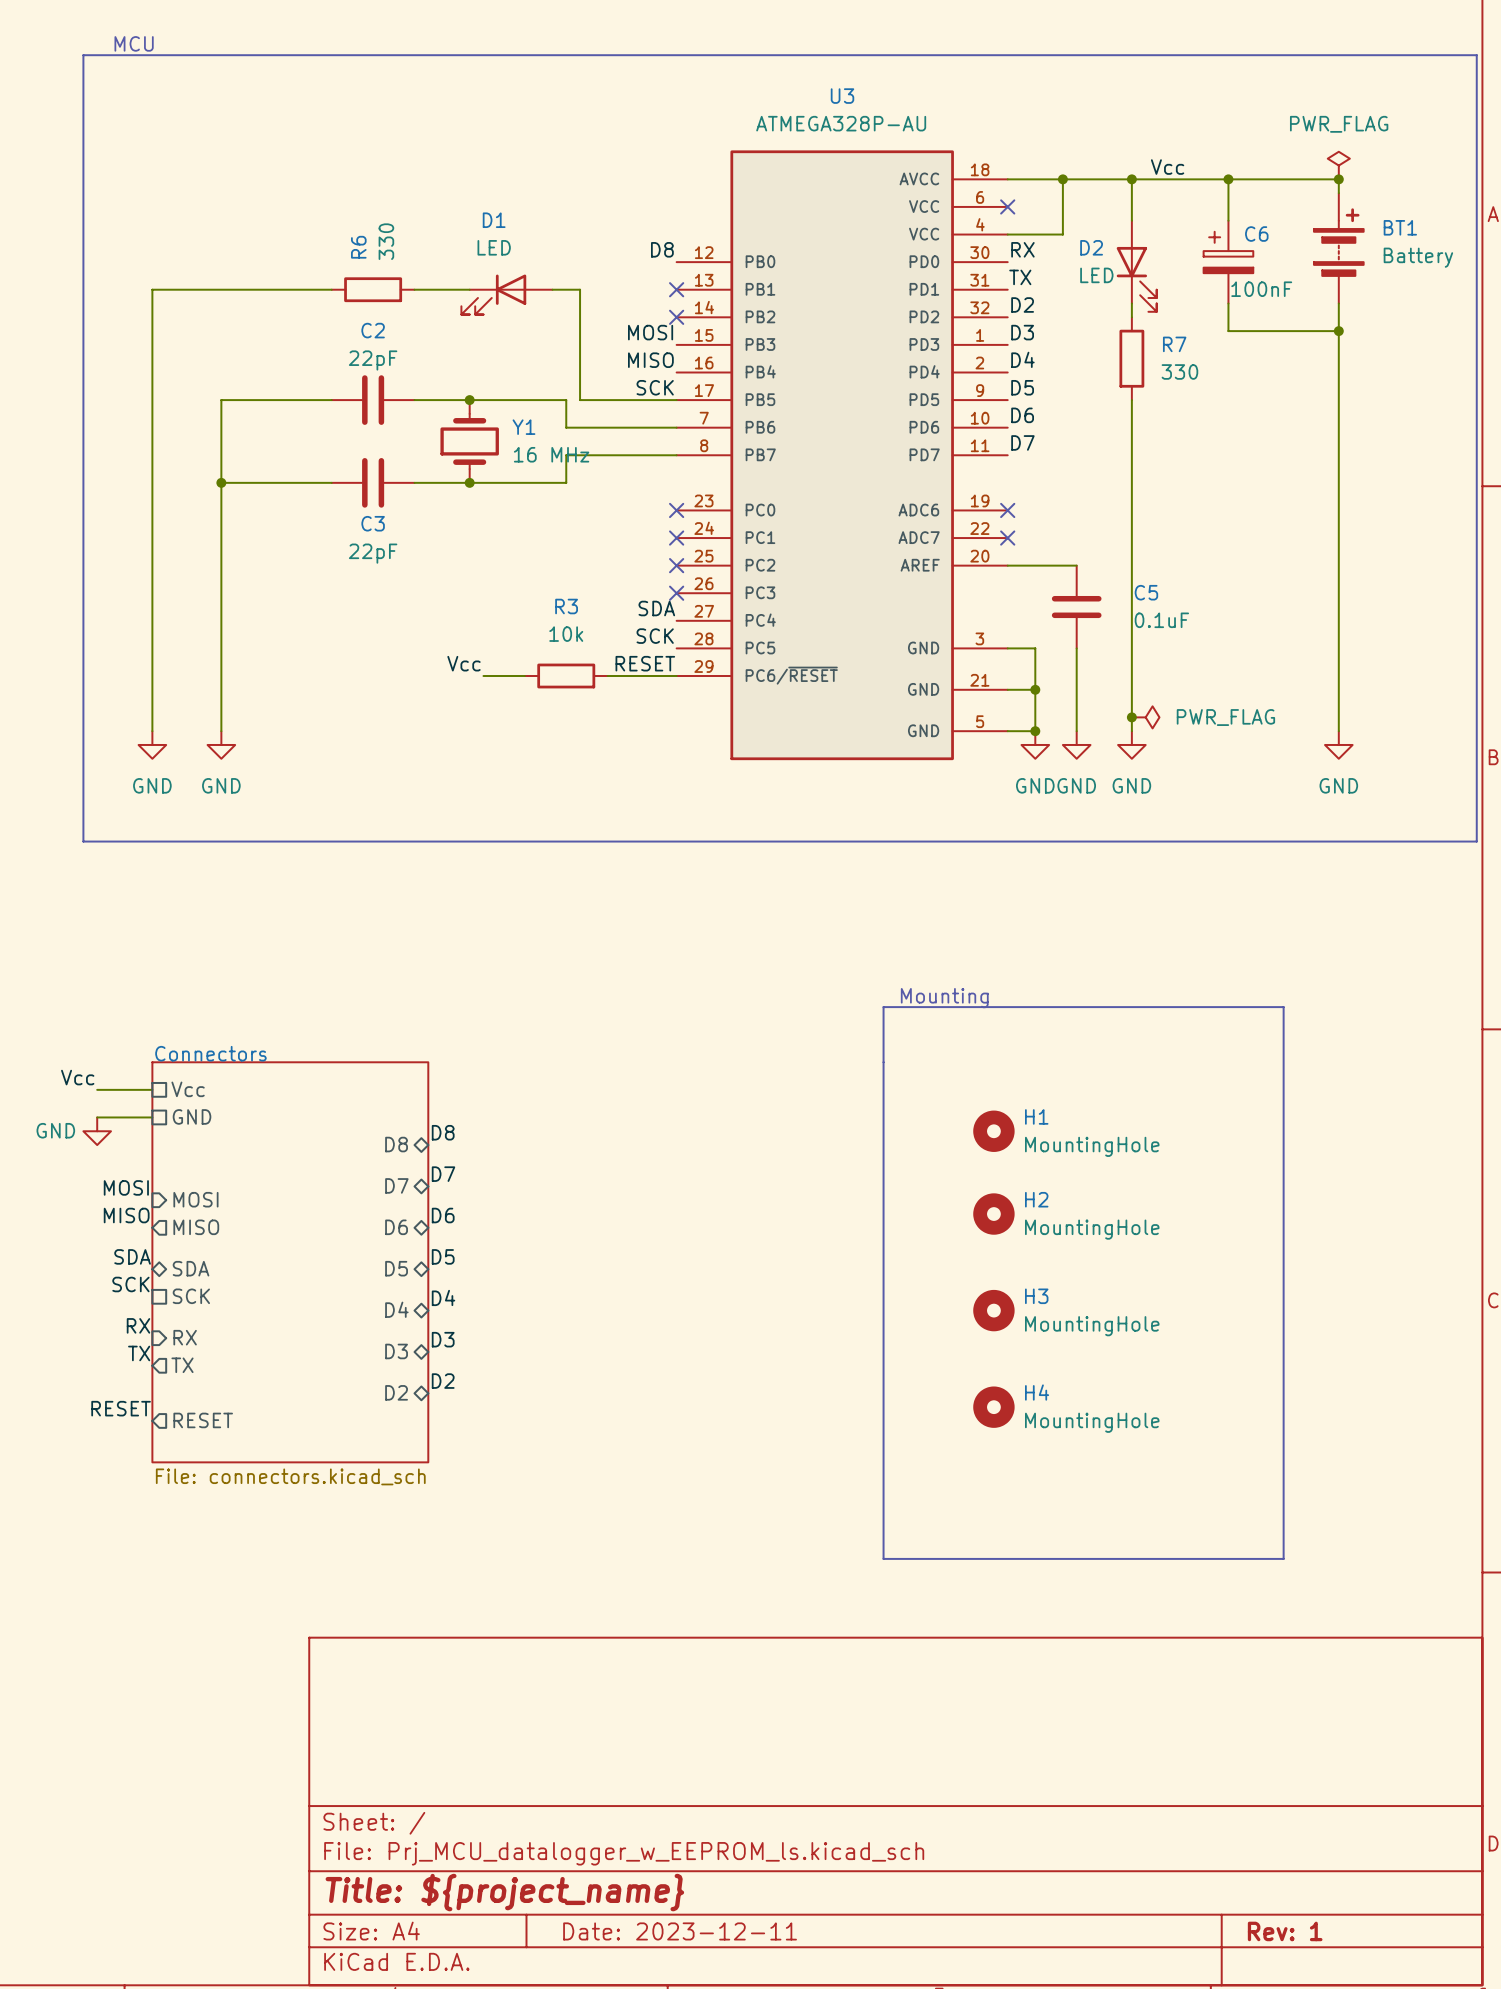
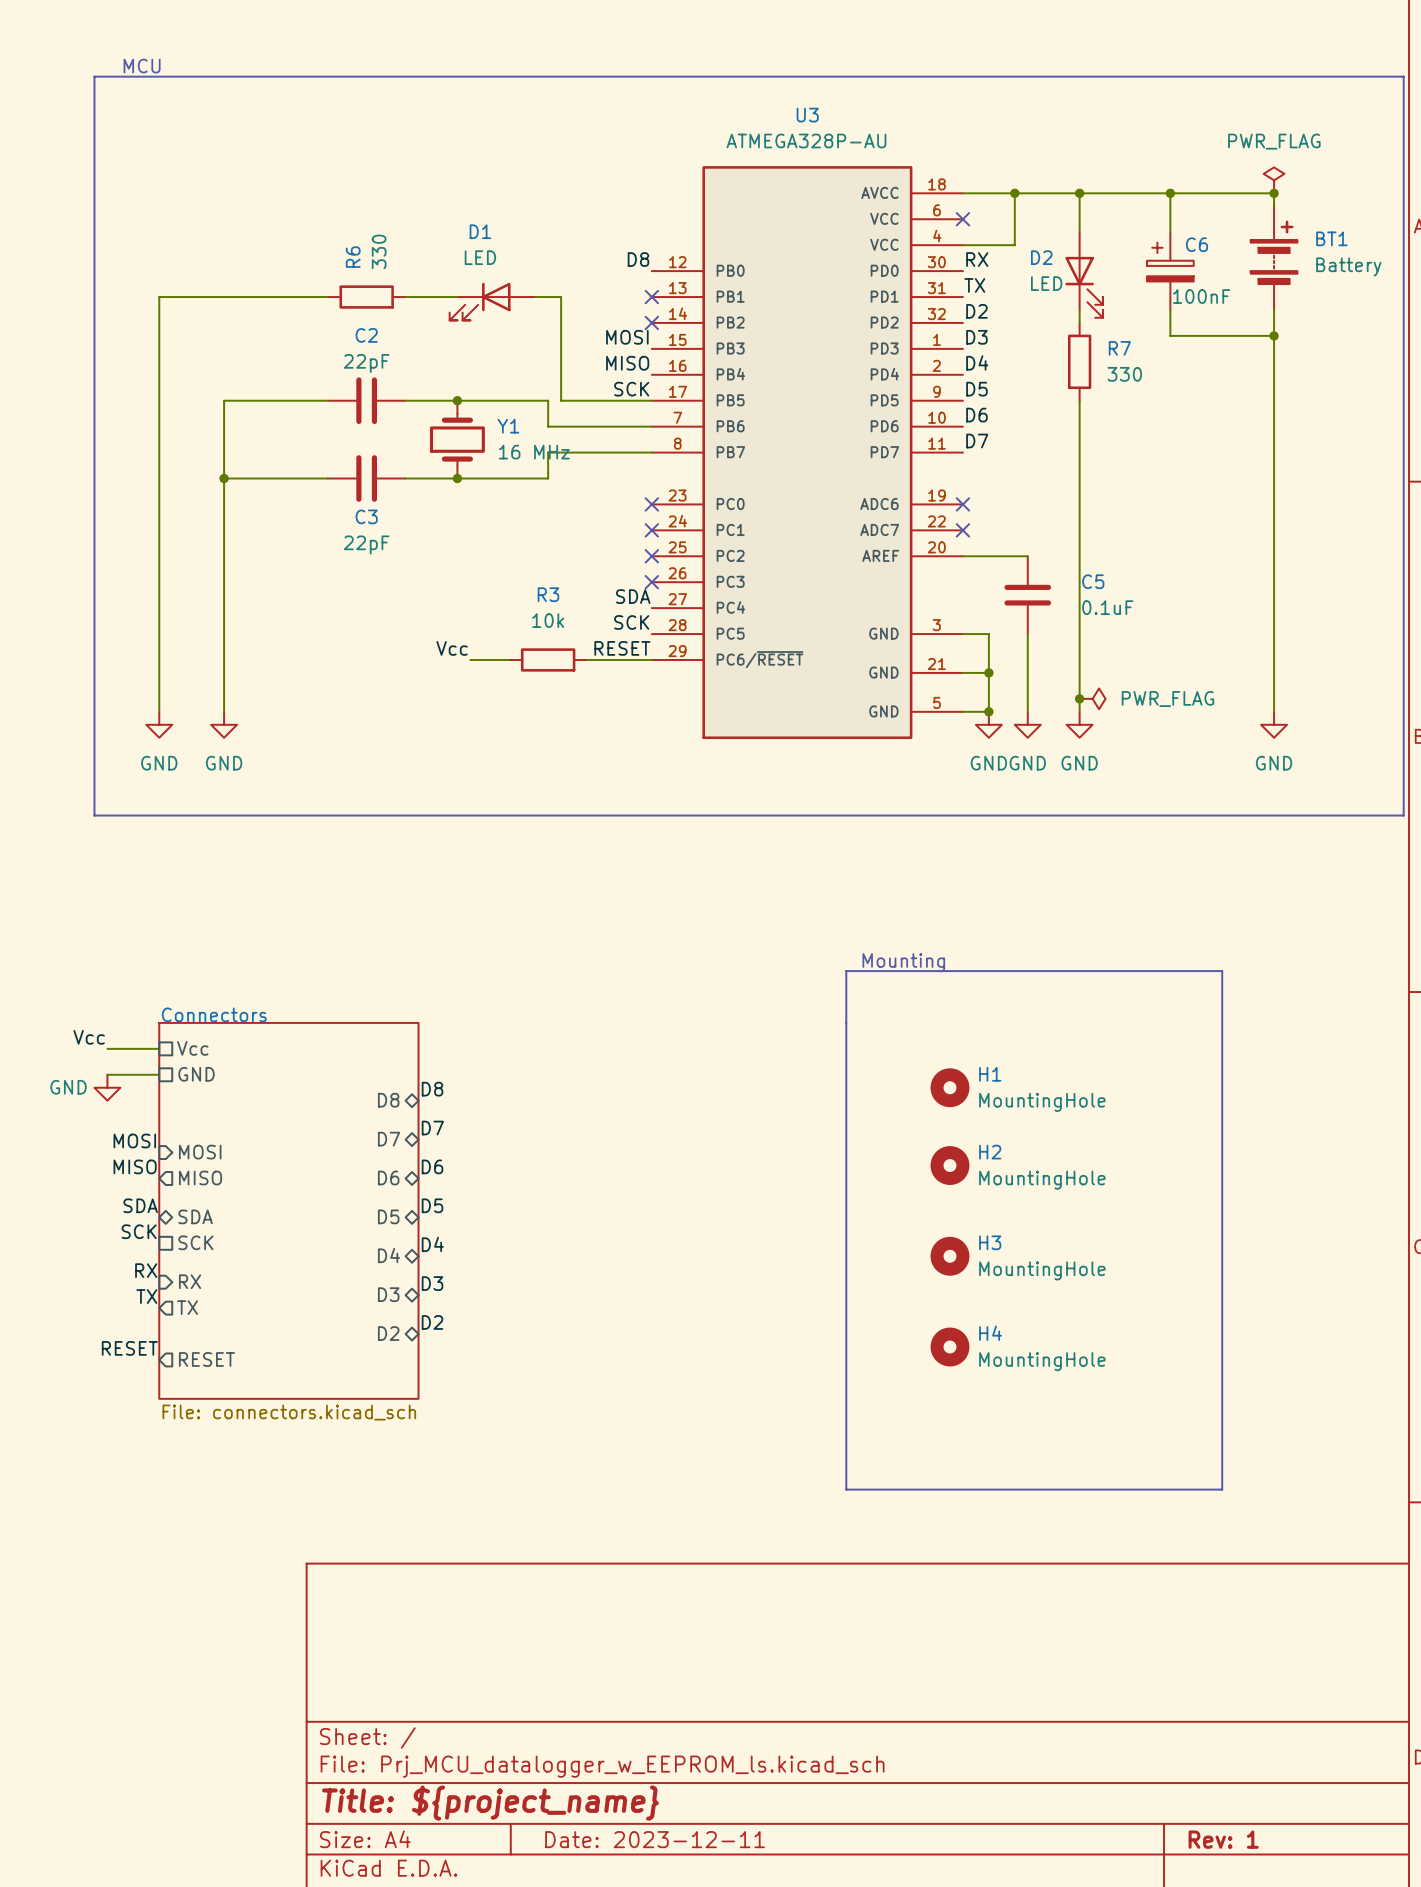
label: Vcc (1167, 167) -> none

